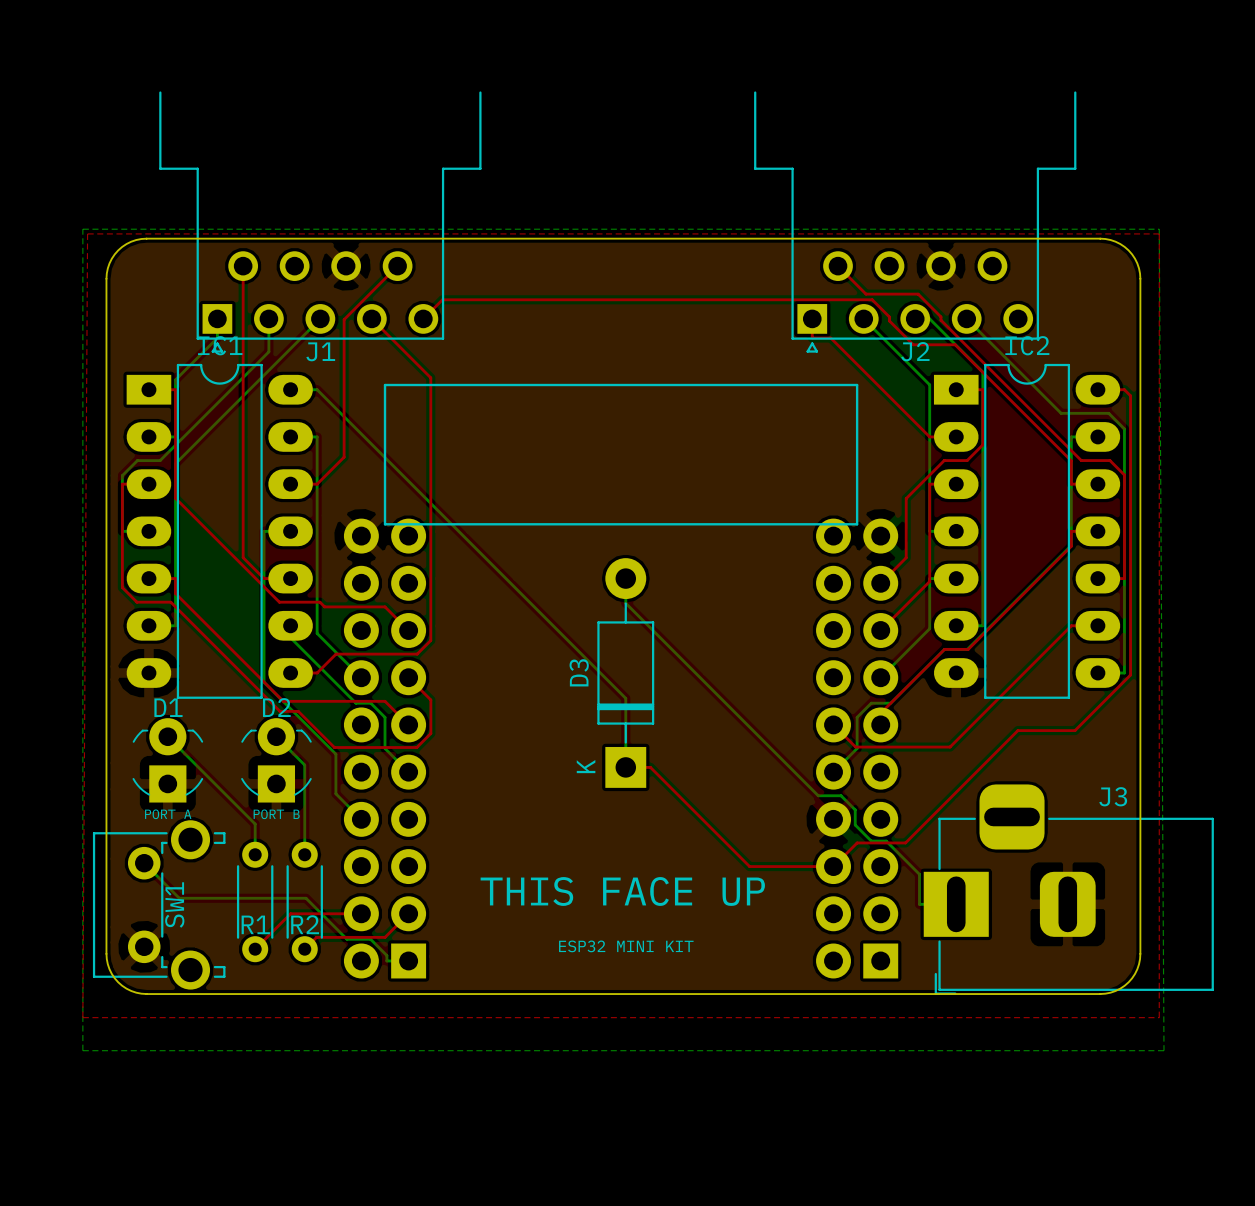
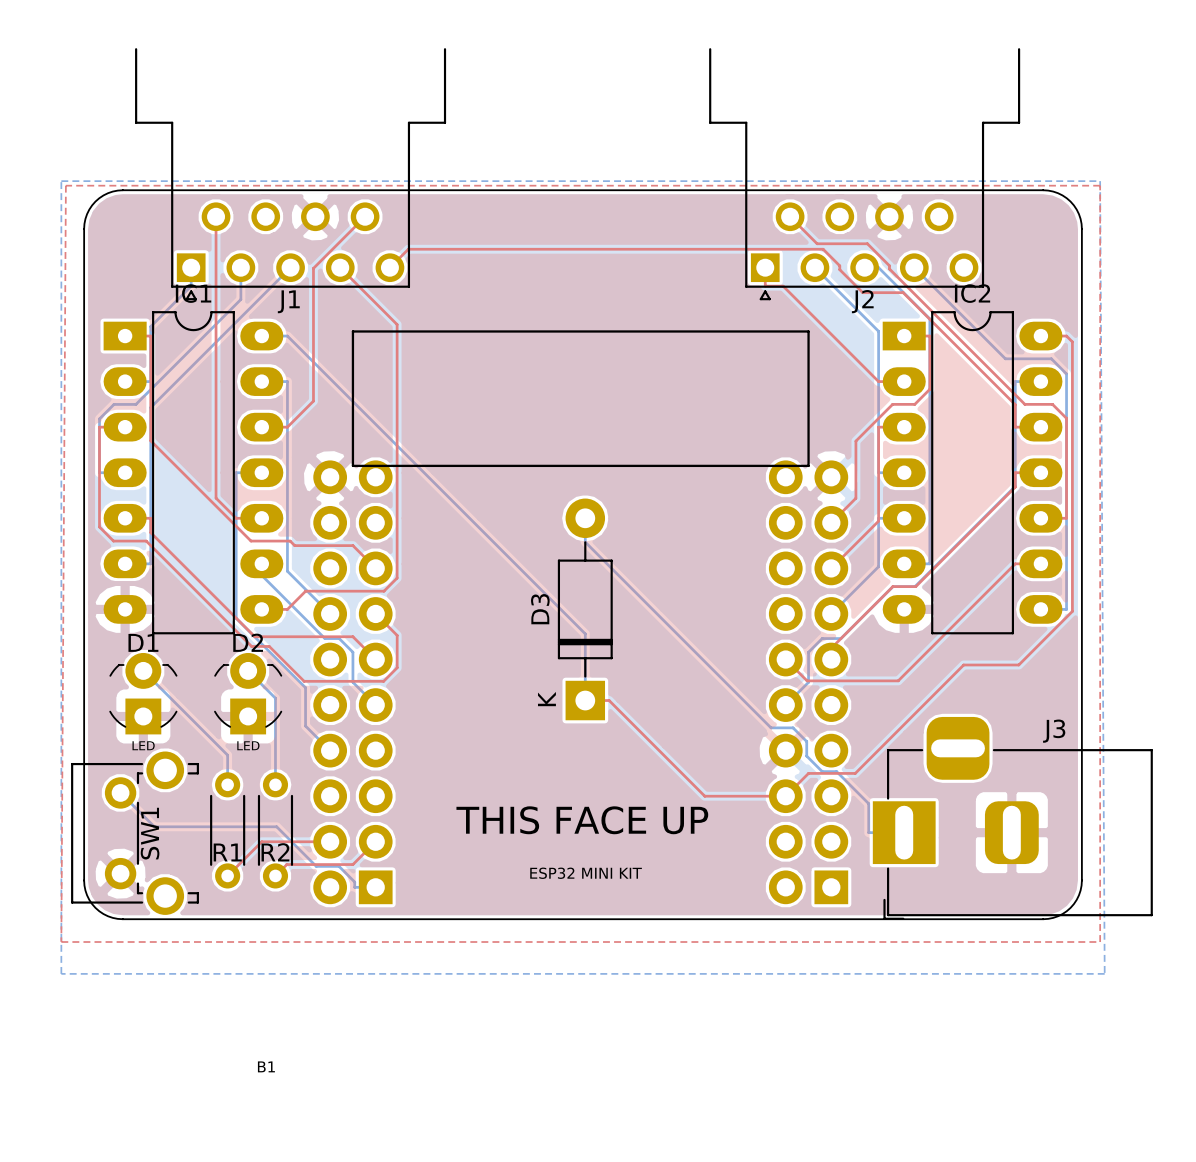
D1 value: PORT A (168, 814) -> LED (143, 745)
D2 value: PORT B (276, 814) -> LED (248, 745)
B1 name: none -> B1 (266, 1066)

